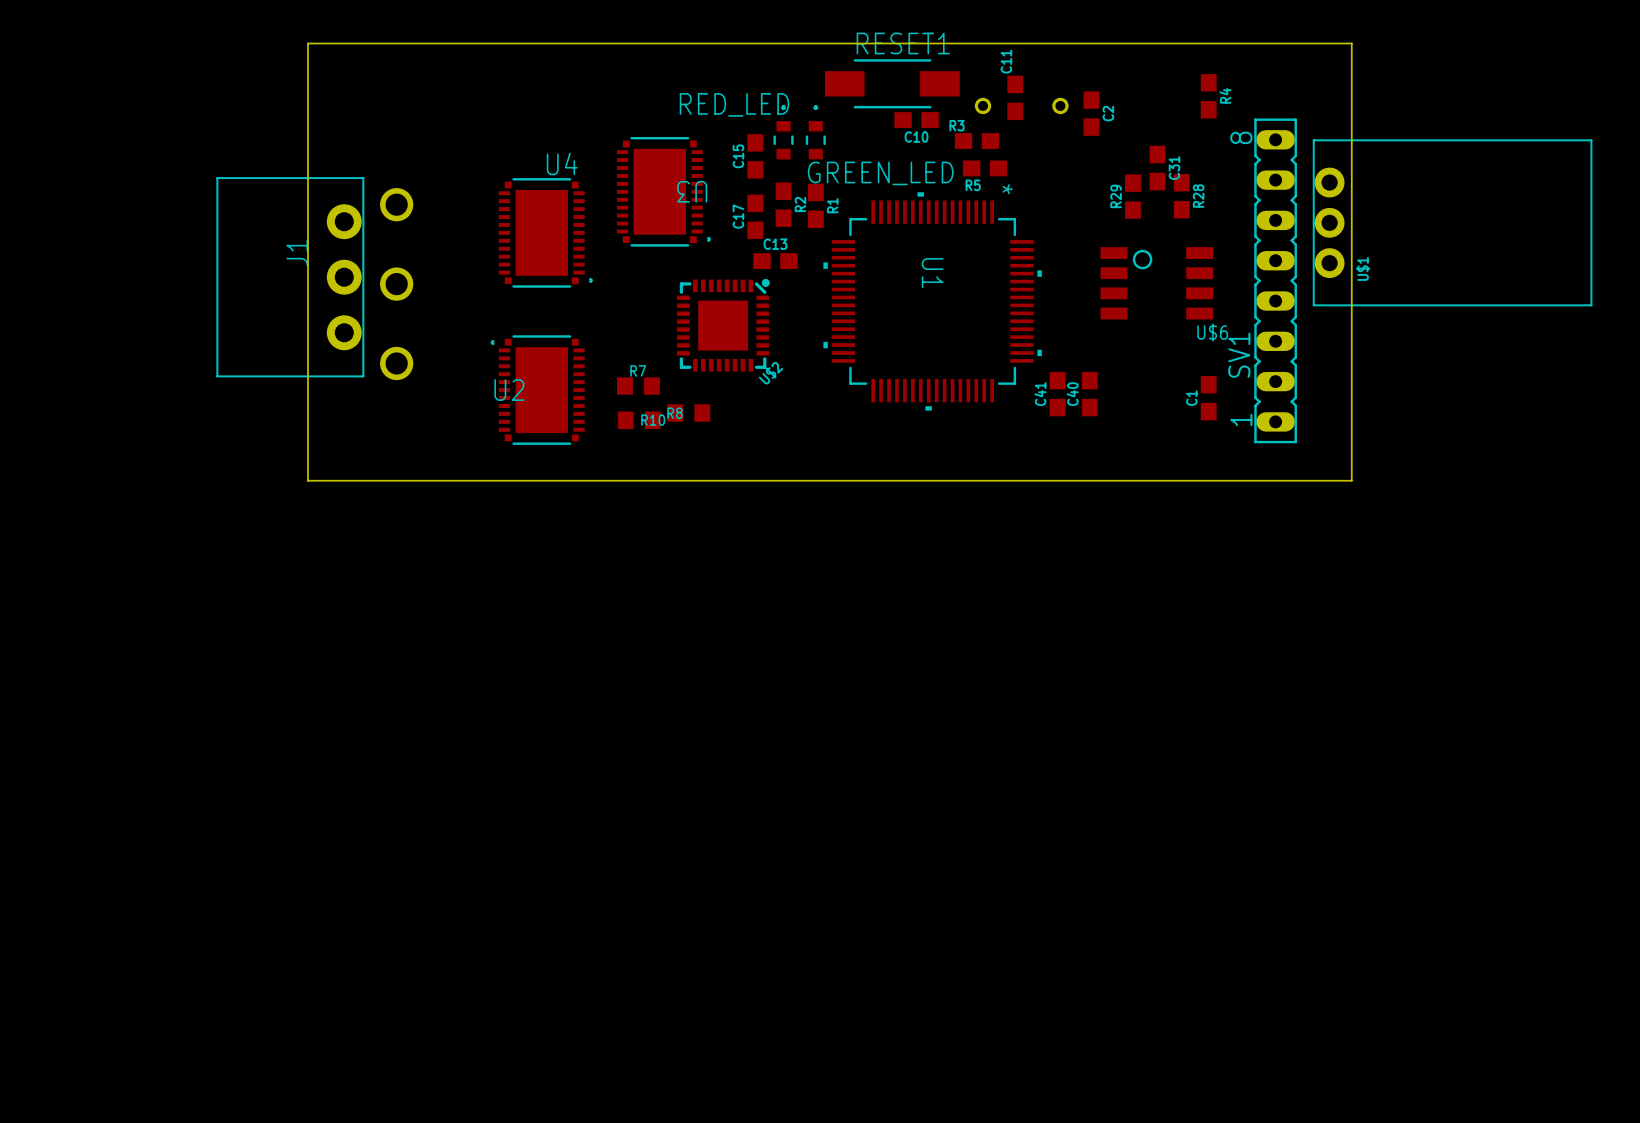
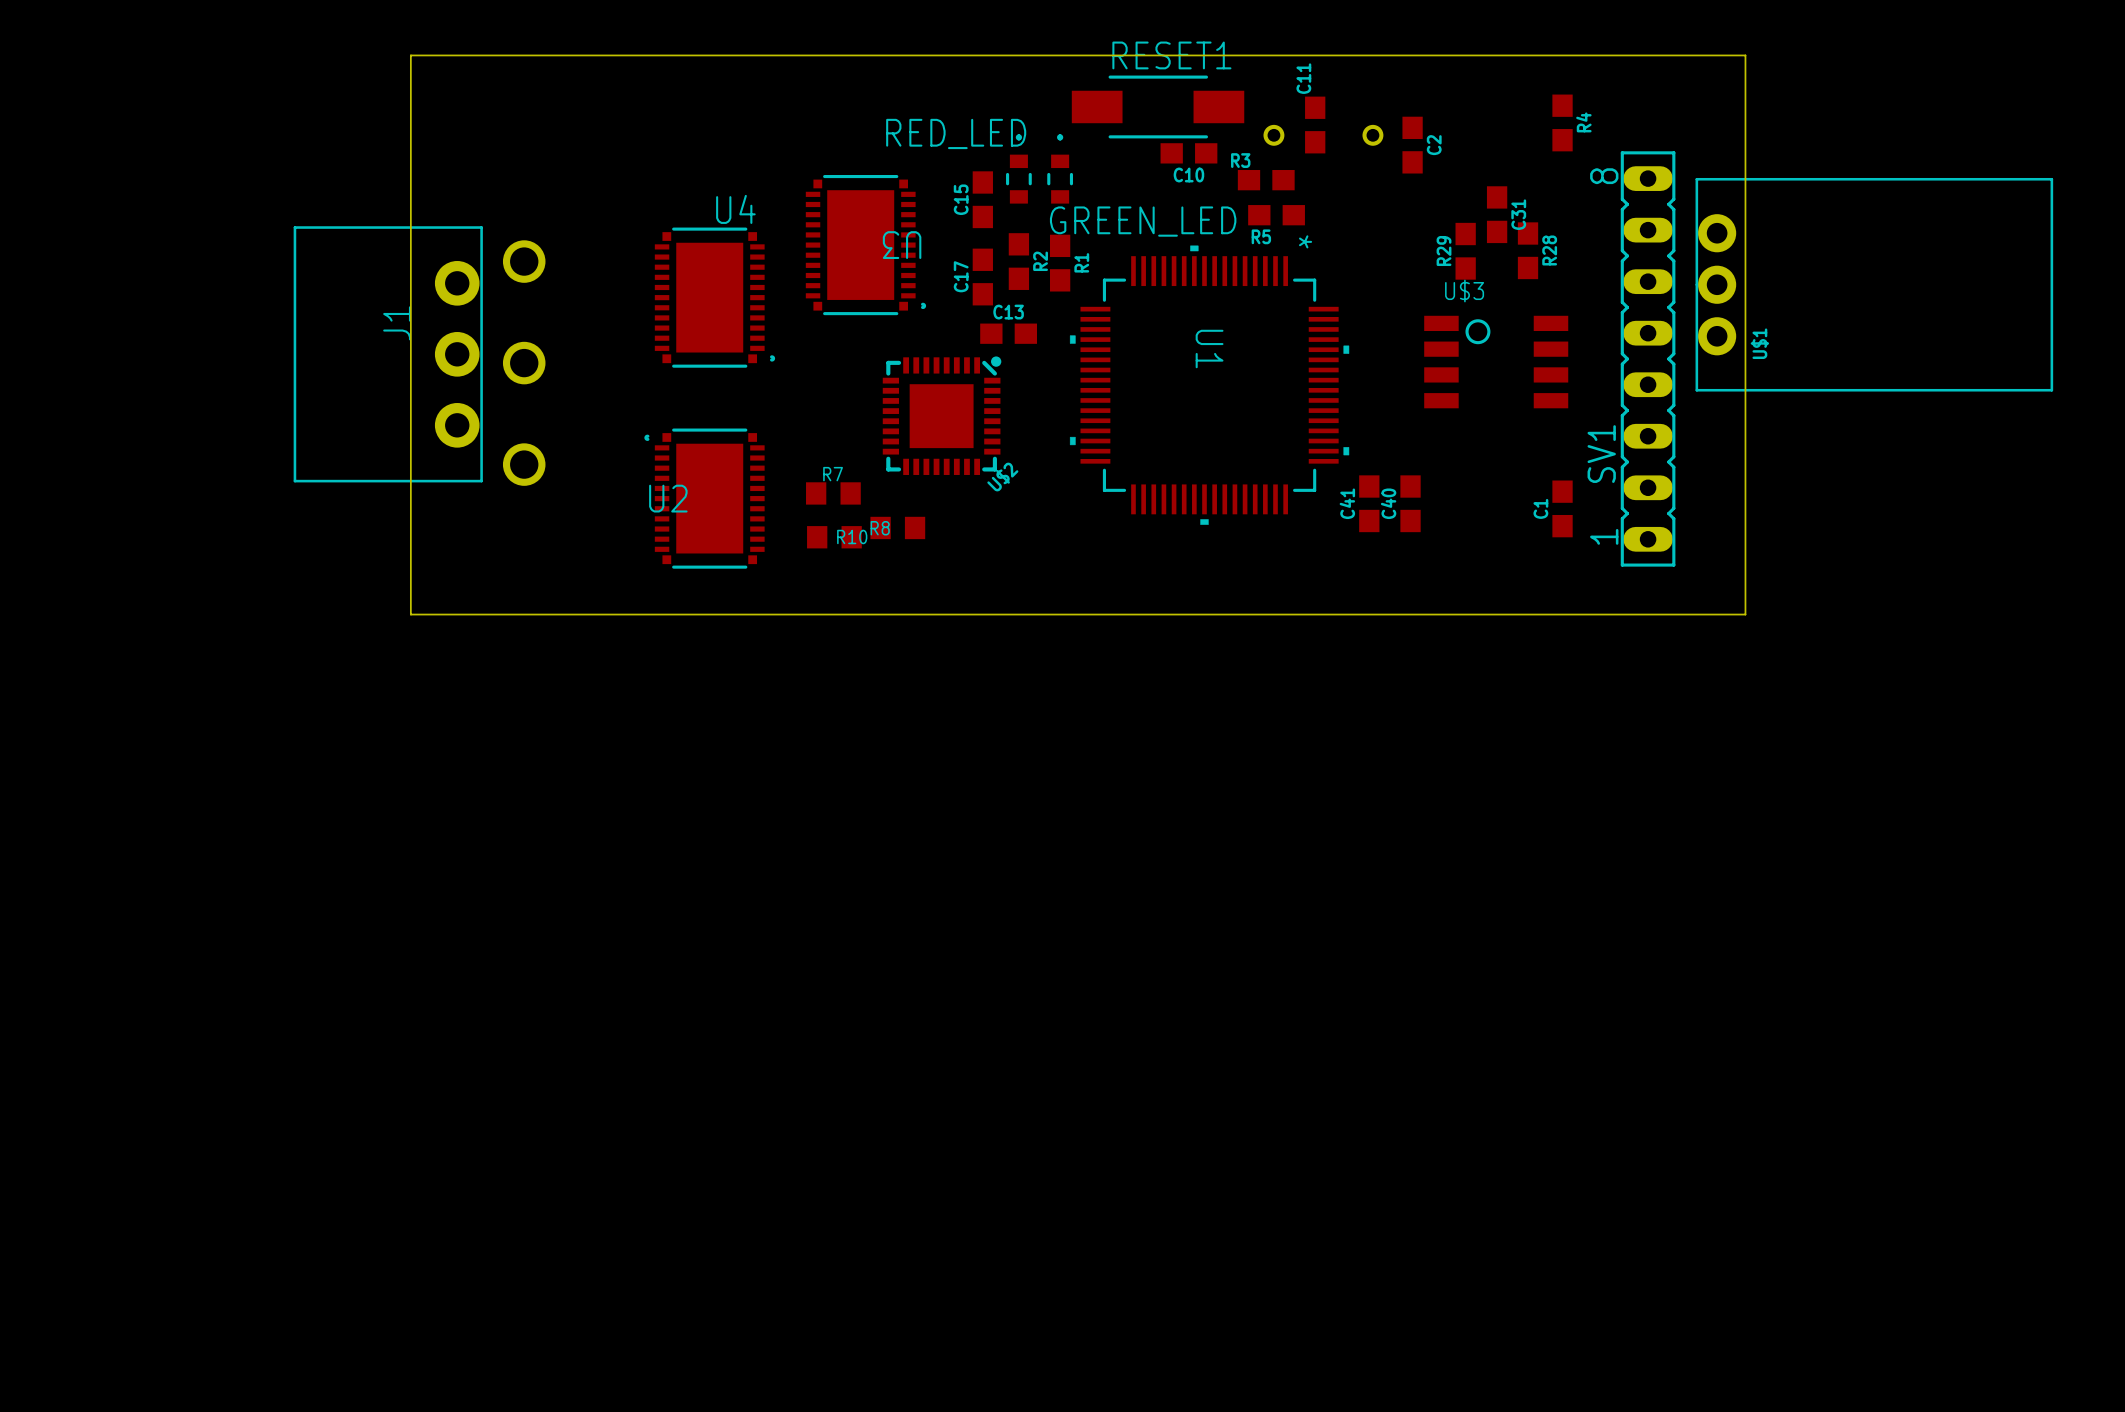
U$6 name: U$6 (1212, 332) -> U$3 (1464, 291)

